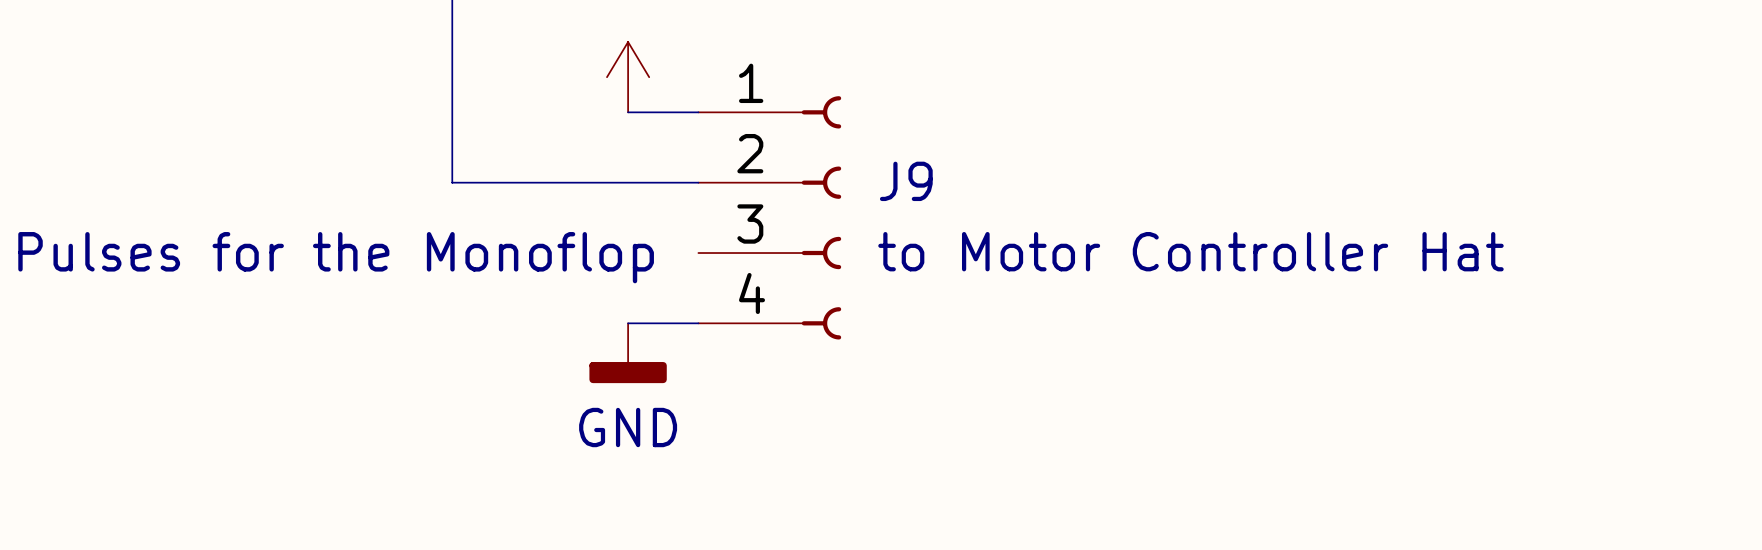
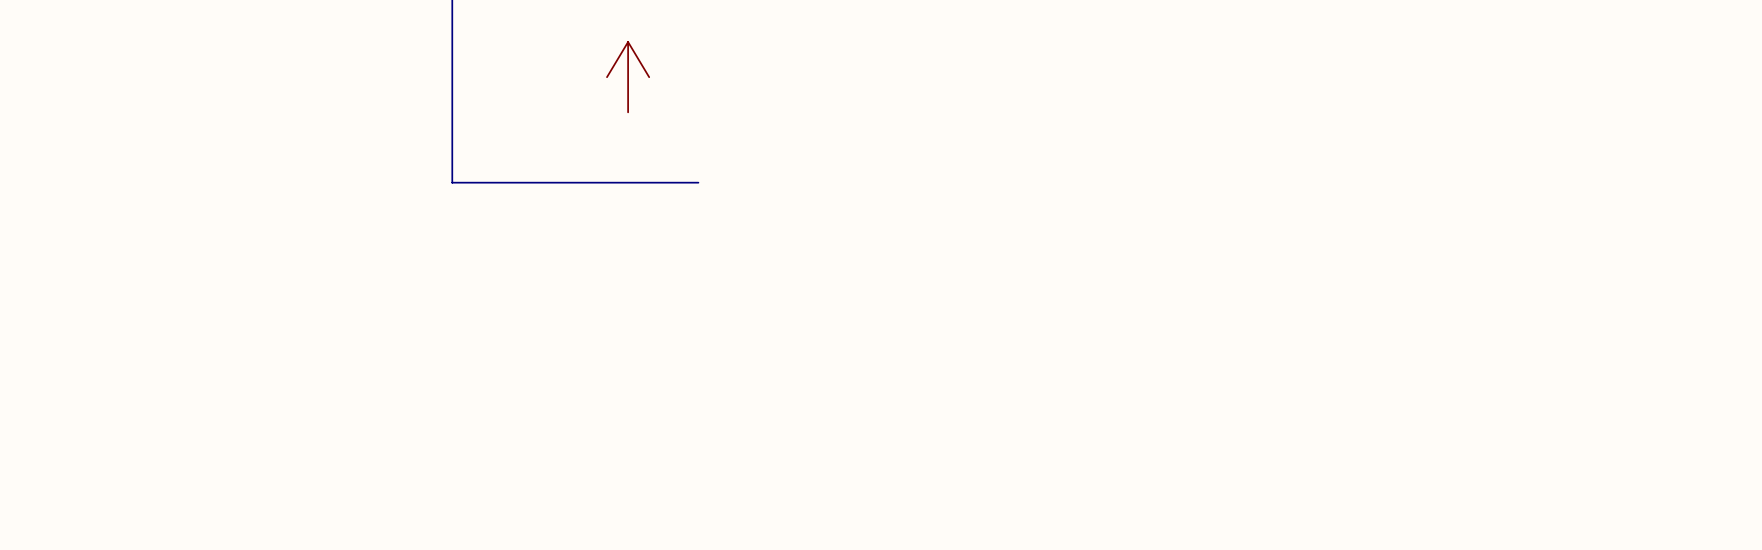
wire: (628, 112) (698, 112) -> none
J9: to Motor Controller Hat (769, 217) -> none
text: Pulses for the Monoflop (336, 257) -> none
wire: (628, 323) (698, 323) -> none
power symbol: GND (628, 353) -> none

